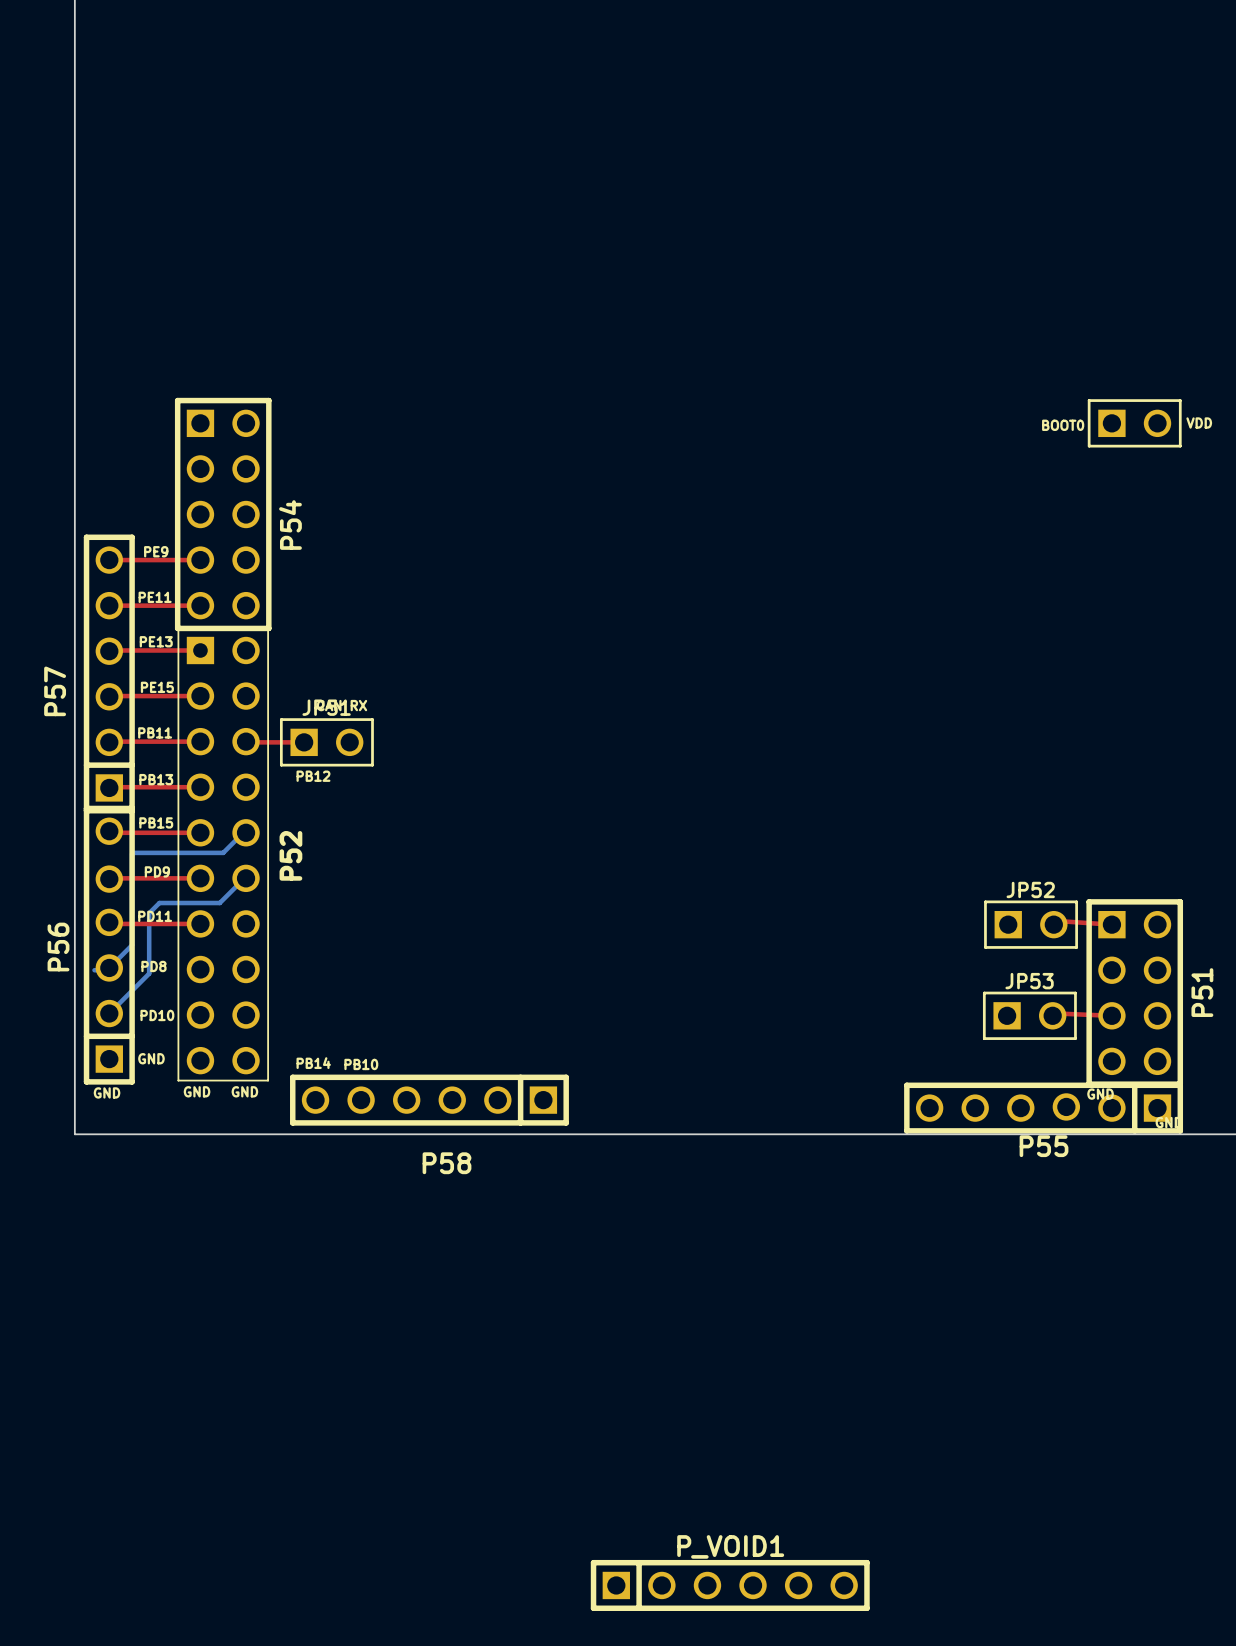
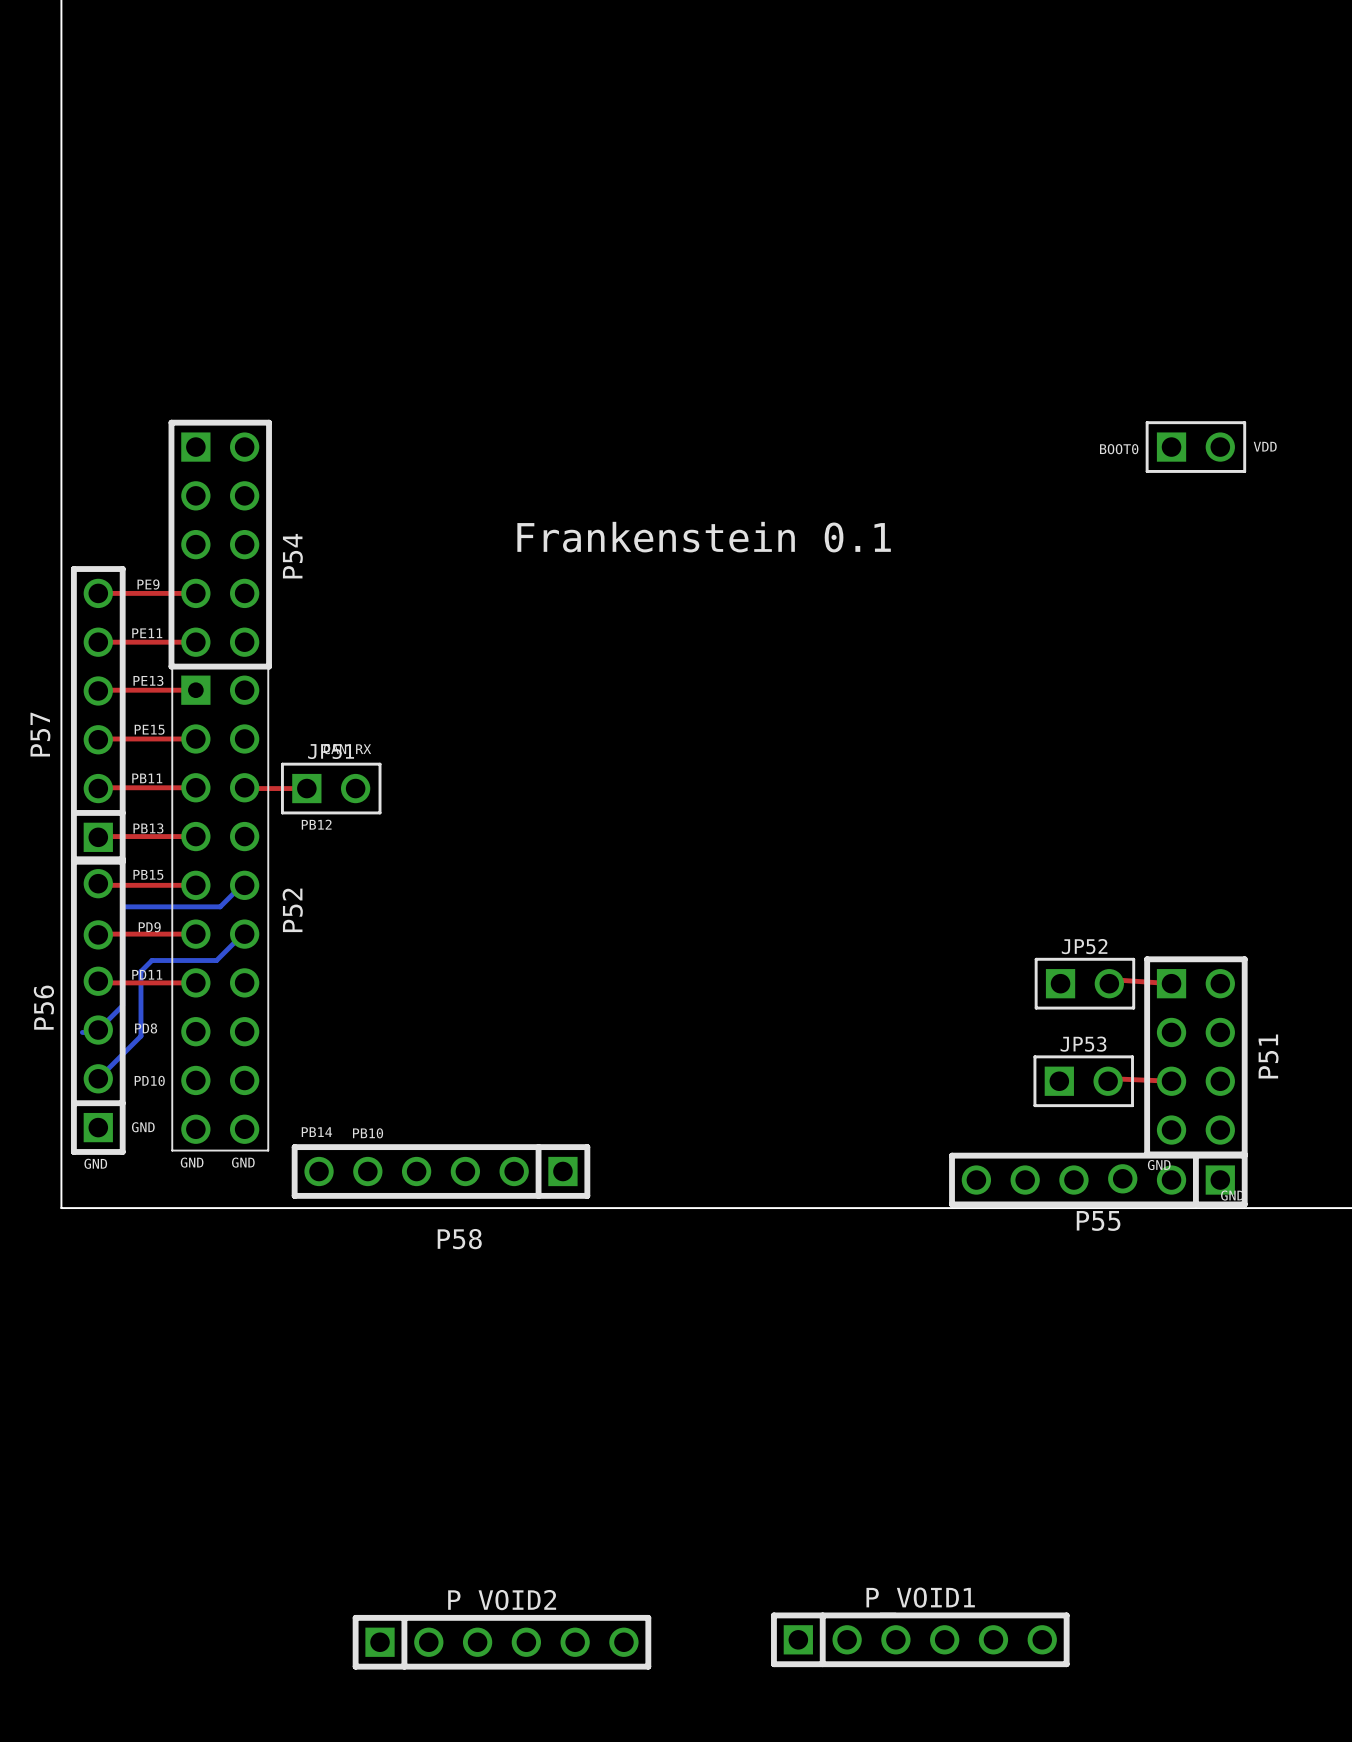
text: none -> Frankenstein 0.1 (704, 537)
P_VOID2: none -> (501, 1642)
P_VOID1 position: (730, 1585) -> (920, 1639)

